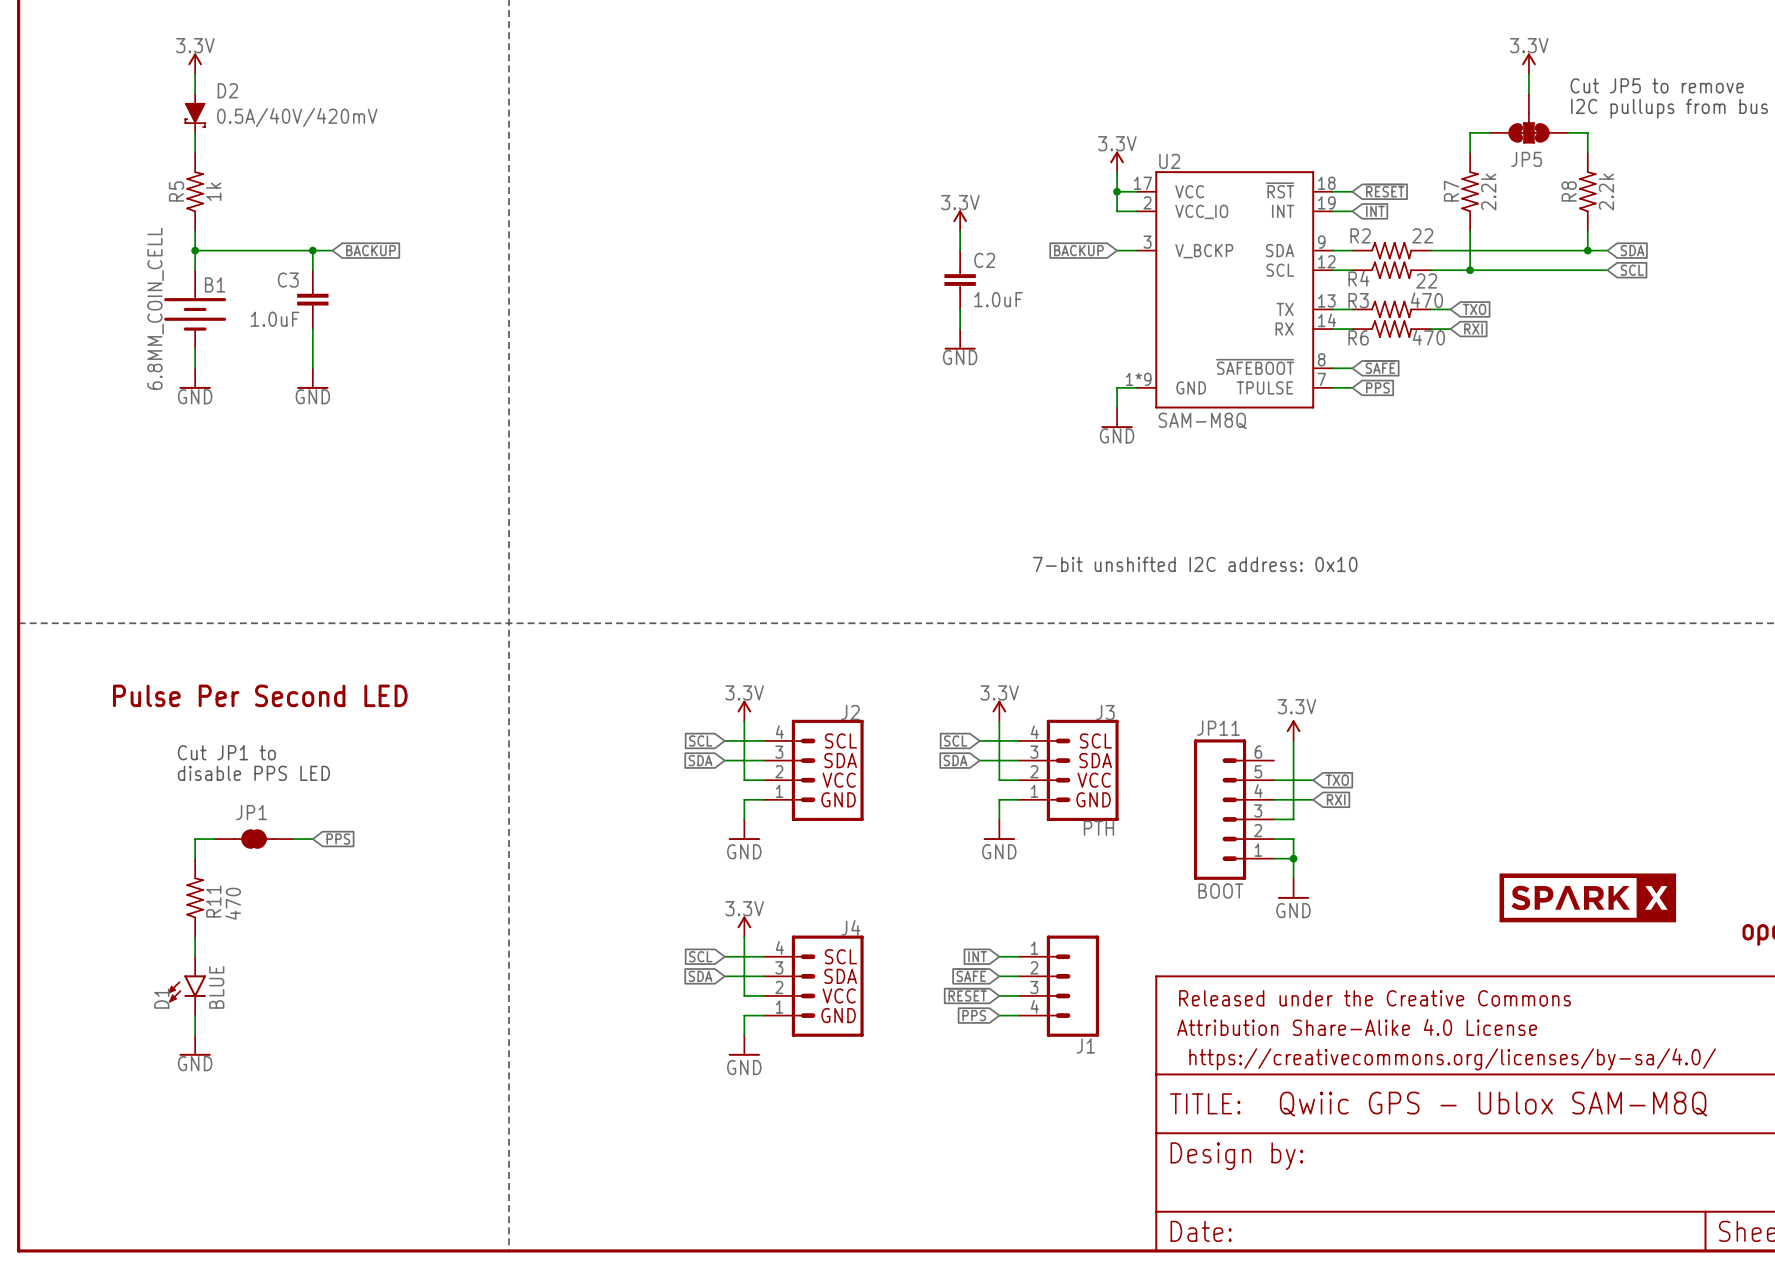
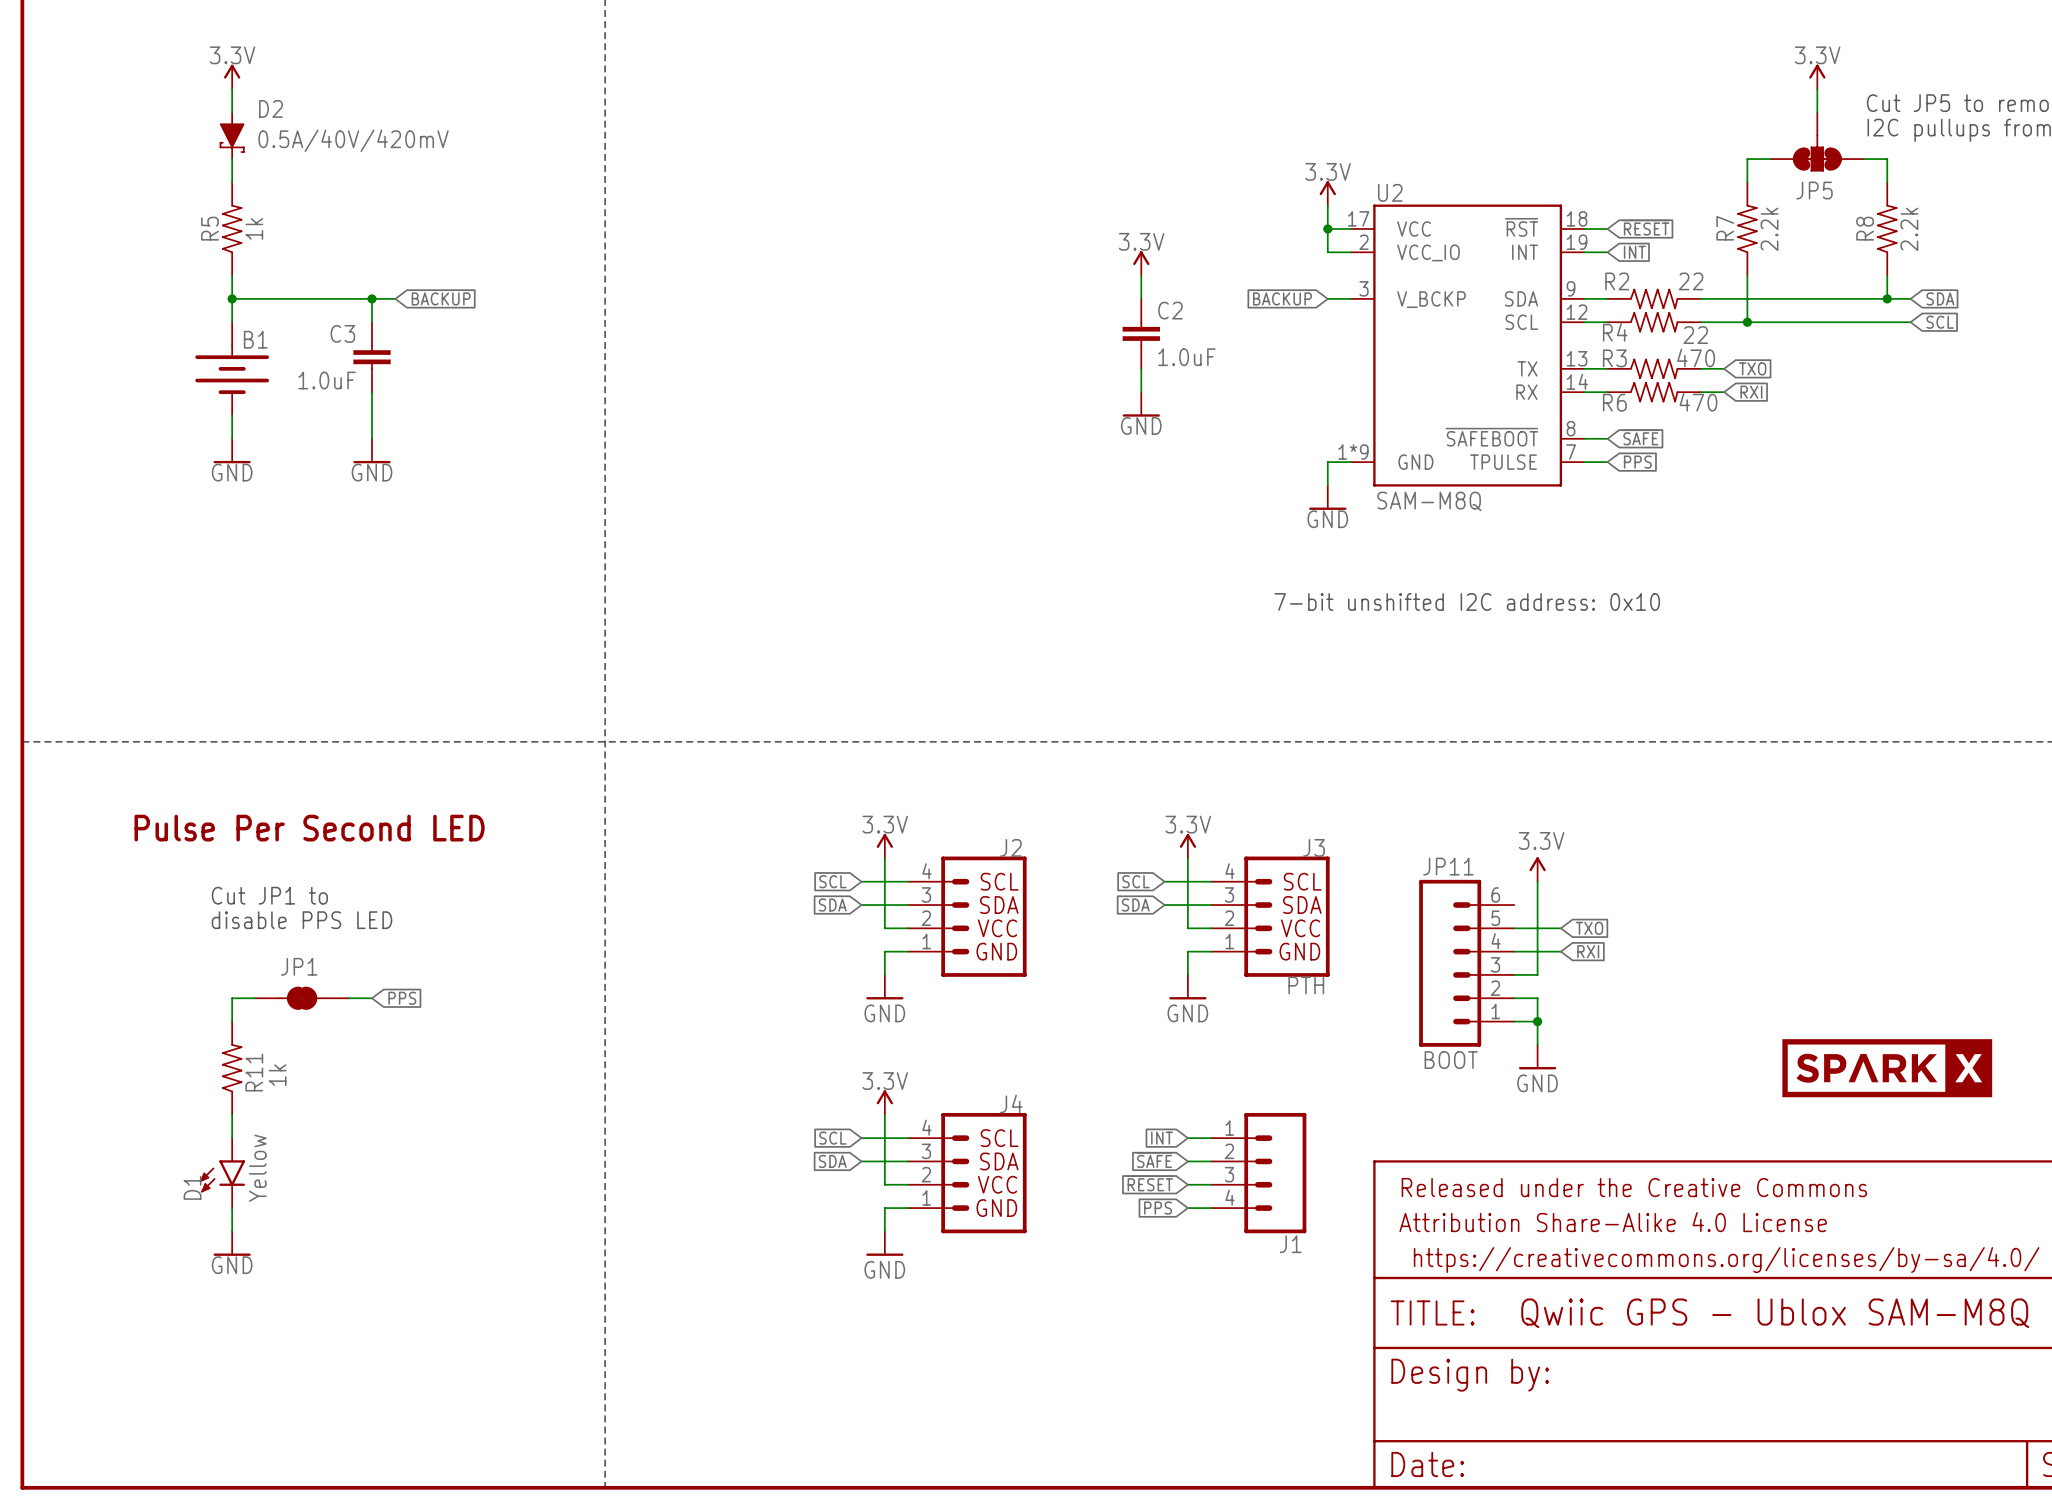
B1 value: 6.8MM_COIN_CELL (155, 308) -> none
text position: 7-bit unshifted I2C address: 0x10 (1195, 564) -> 7-bit unshifted I2C address: 0x10 (1467, 601)
R11 value: 470 (233, 903) -> 1k (277, 1075)
D1 value: BLUE (216, 987) -> Yellow (257, 1168)

